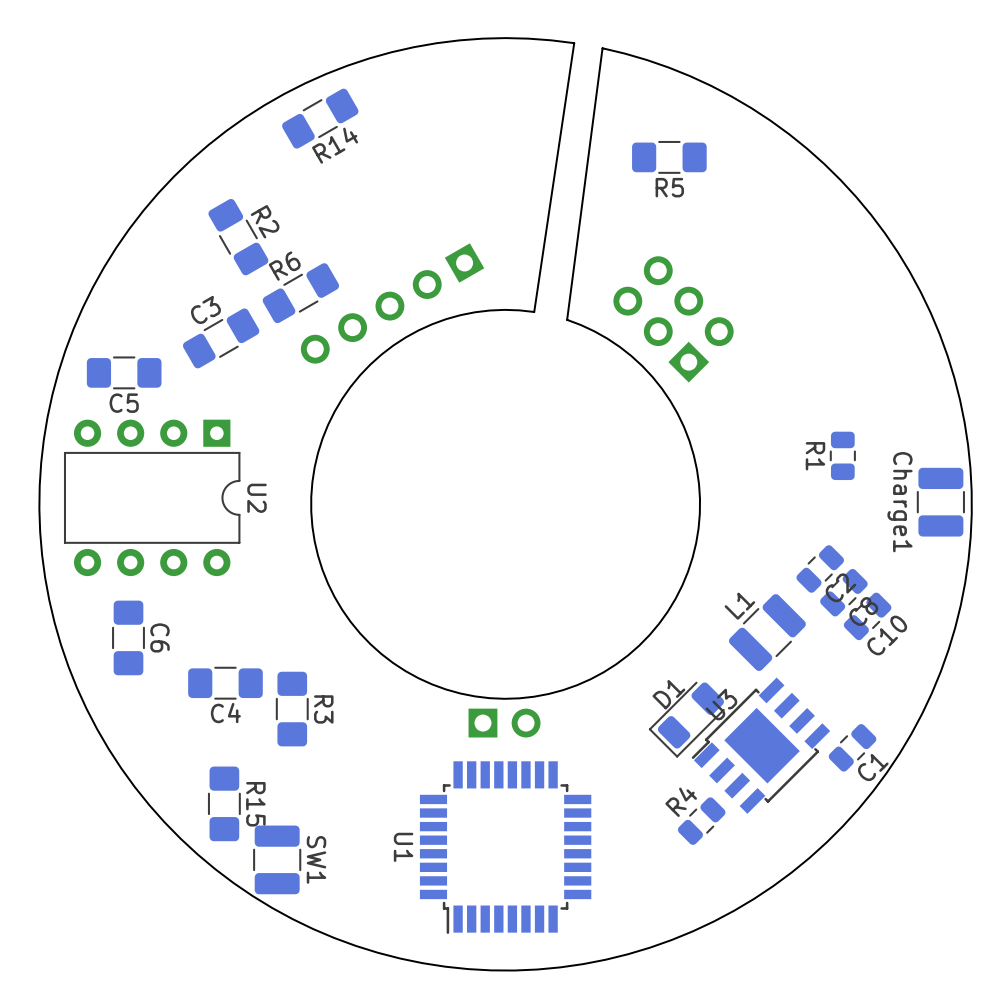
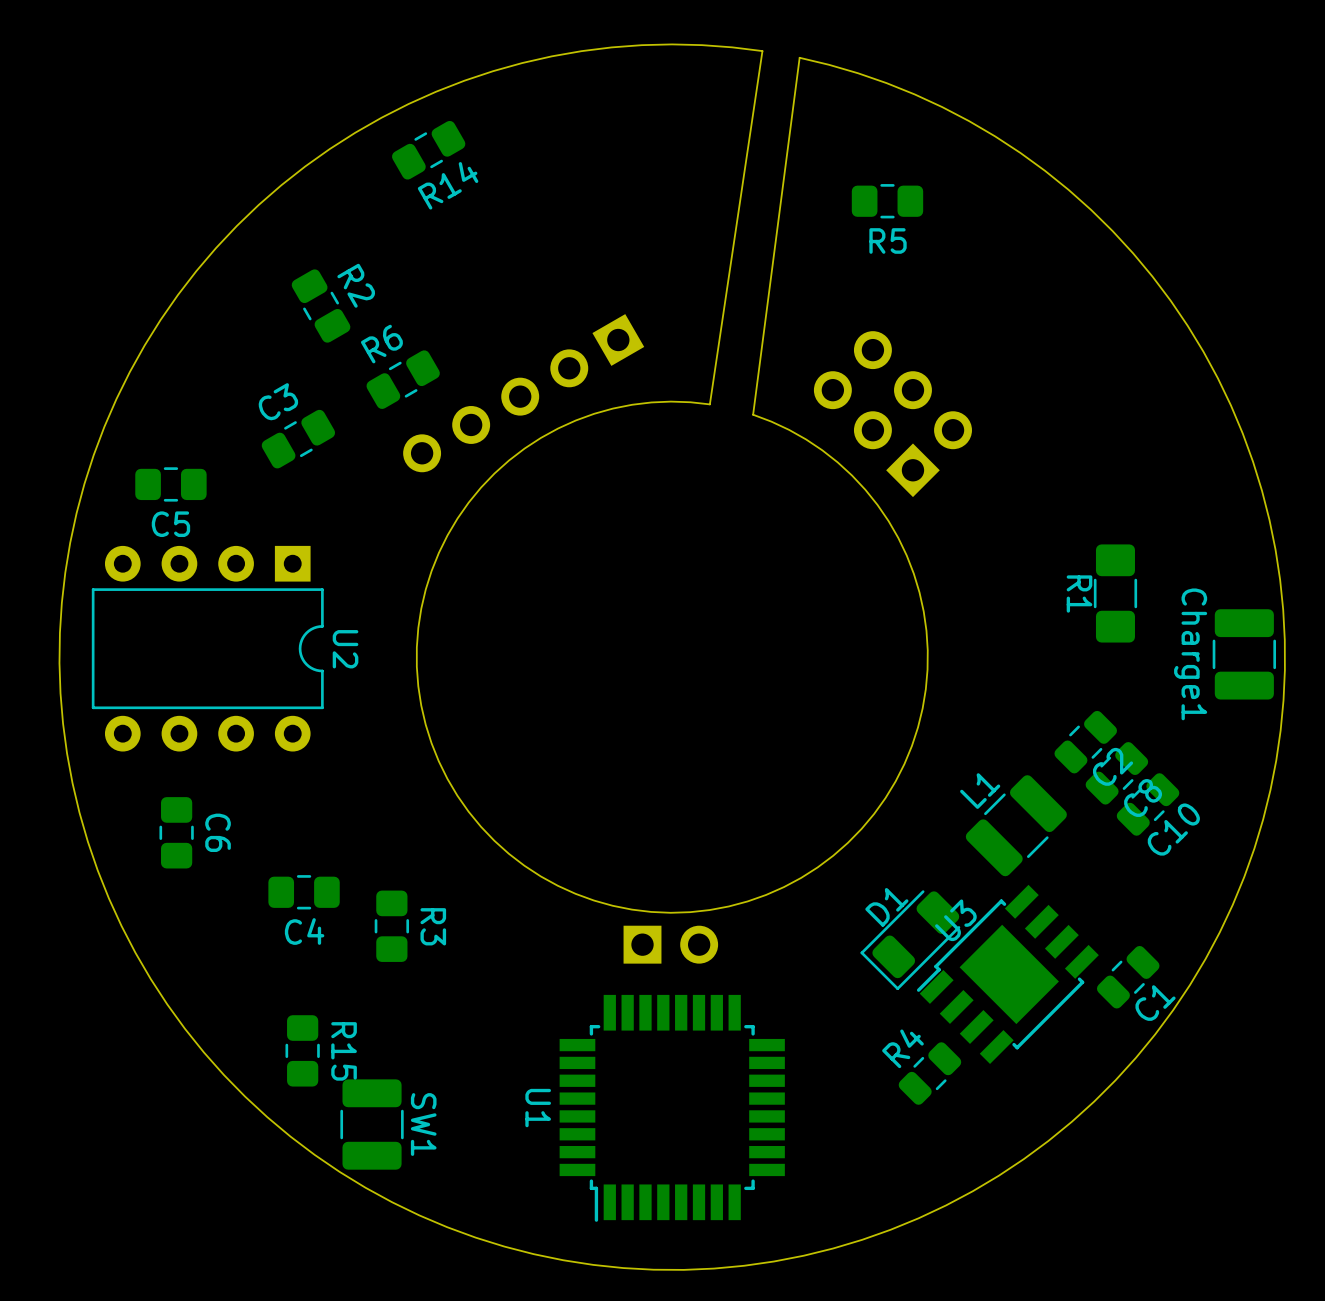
R14 footprint: [282, 88, 359, 149] -> [392, 120, 466, 180]
R5 footprint: [632, 140, 707, 174] -> [851, 184, 924, 219]
R2 footprint: [208, 198, 269, 276] -> [291, 269, 351, 343]
R6 footprint: [262, 263, 340, 324] -> [366, 350, 440, 409]
C3 footprint: [182, 308, 260, 369] -> [261, 409, 336, 469]
C5 footprint: [86, 356, 162, 390] -> [135, 467, 207, 502]
R1 footprint: [829, 431, 856, 481] -> [1093, 544, 1138, 643]
C6 footprint: [112, 600, 145, 676] -> [159, 797, 194, 869]
C4 footprint: [188, 666, 263, 700] -> [268, 875, 340, 910]
R3 footprint: [275, 671, 309, 747] -> [374, 890, 410, 962]
R15 footprint: [207, 766, 241, 842] -> [285, 1015, 320, 1087]

